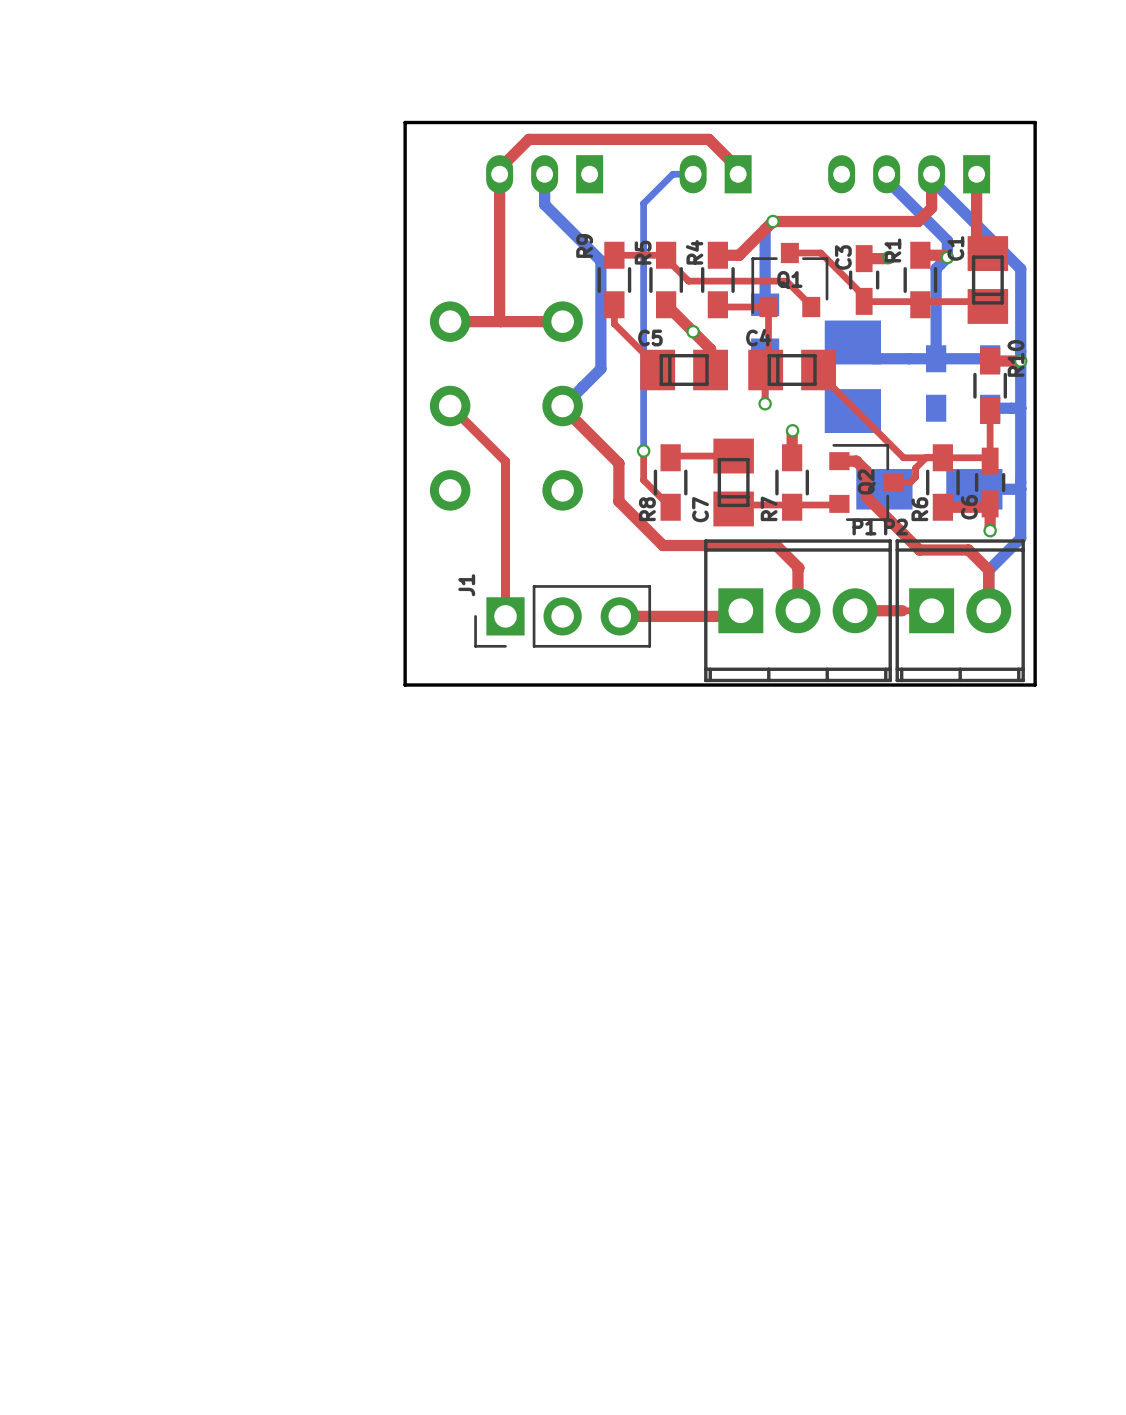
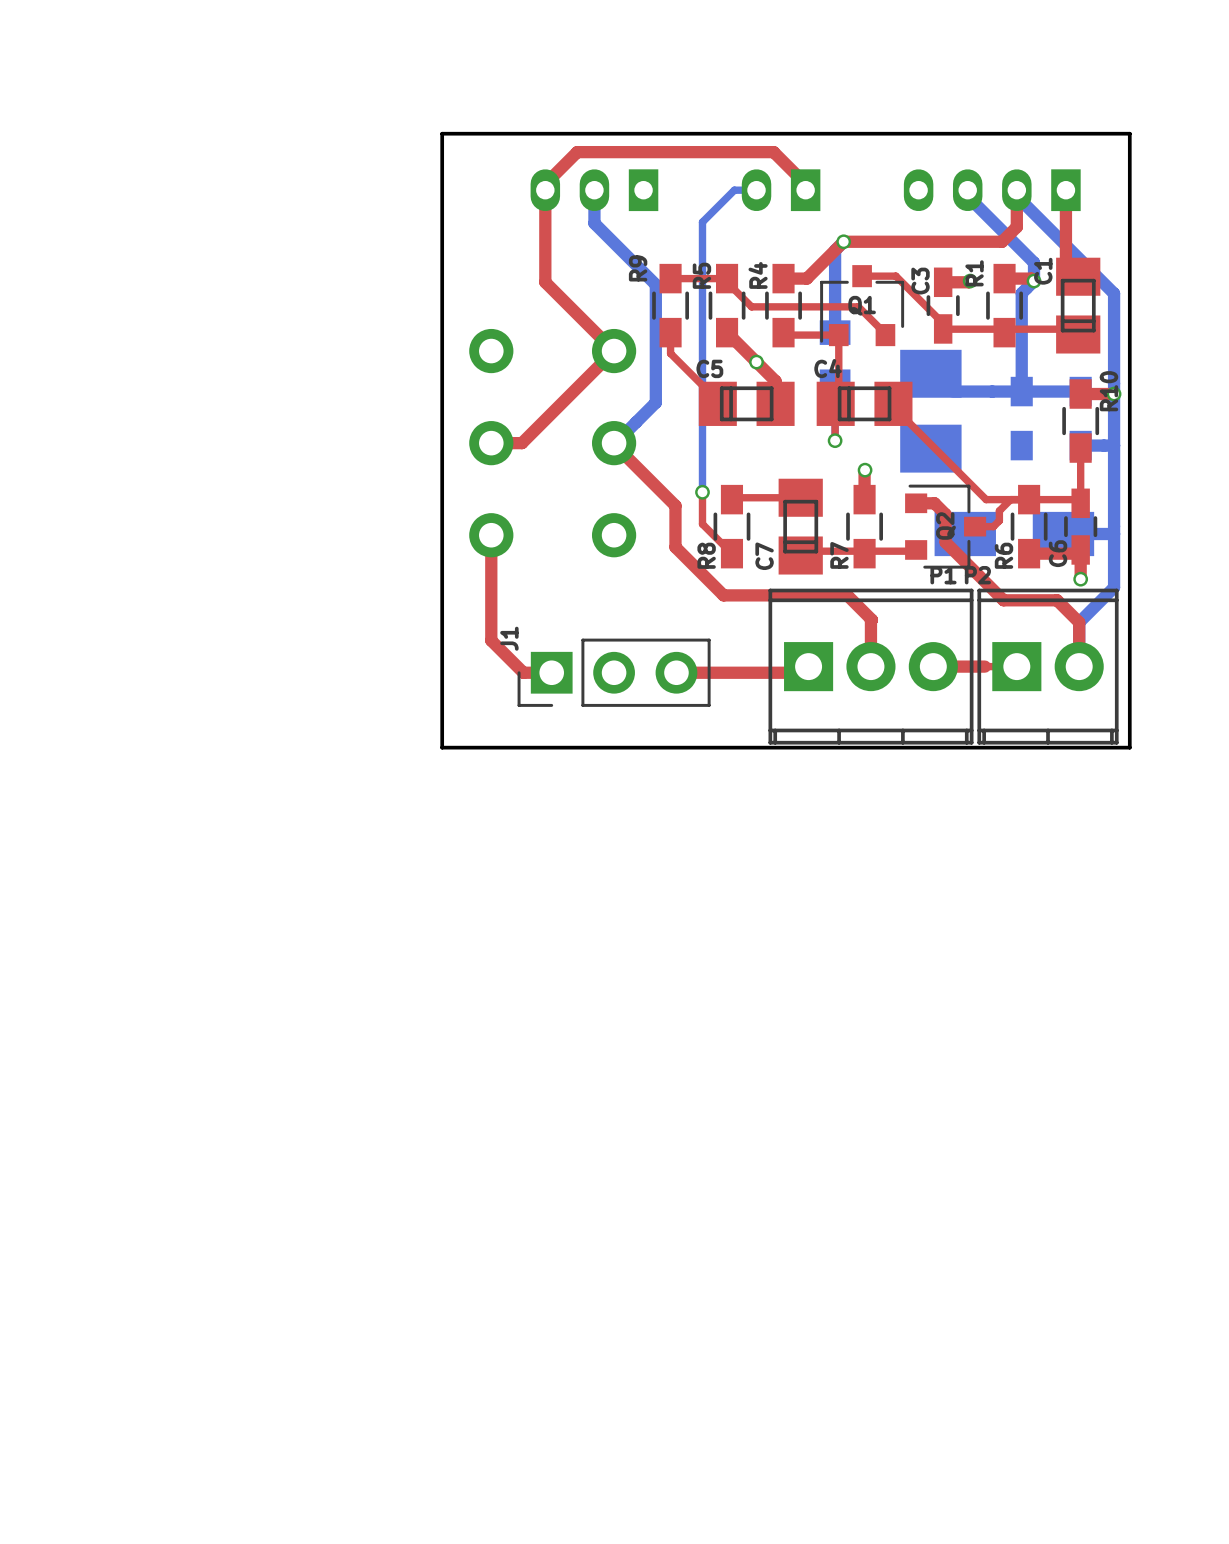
top track: (499, 258) (500, 321) -> (545, 282) (614, 351) (522, 443) (491, 443)
top track: (450, 321) (562, 321) -> none
top track: (450, 406) (505, 461) (505, 616) -> (491, 535) (491, 640) (523, 672) (551, 672)

